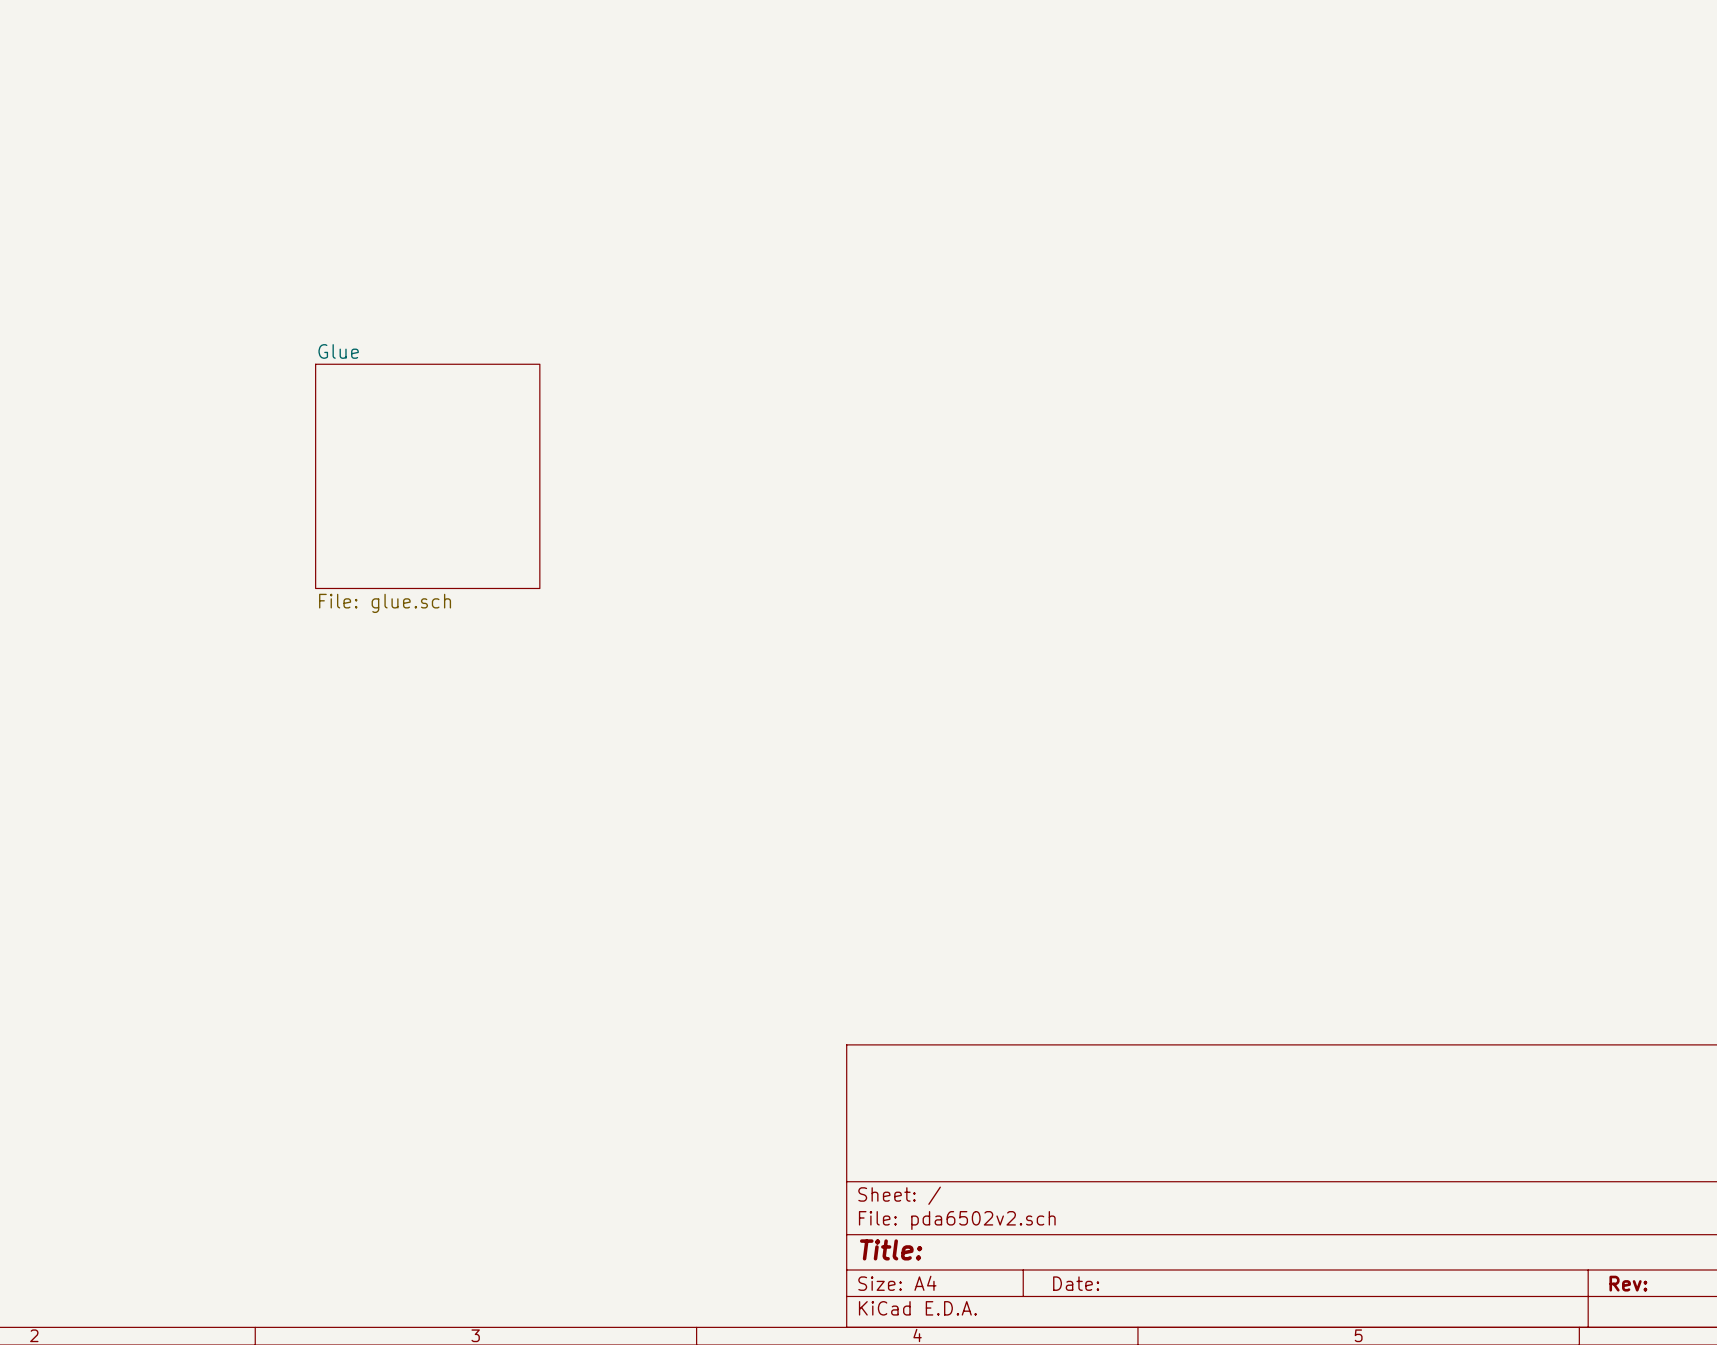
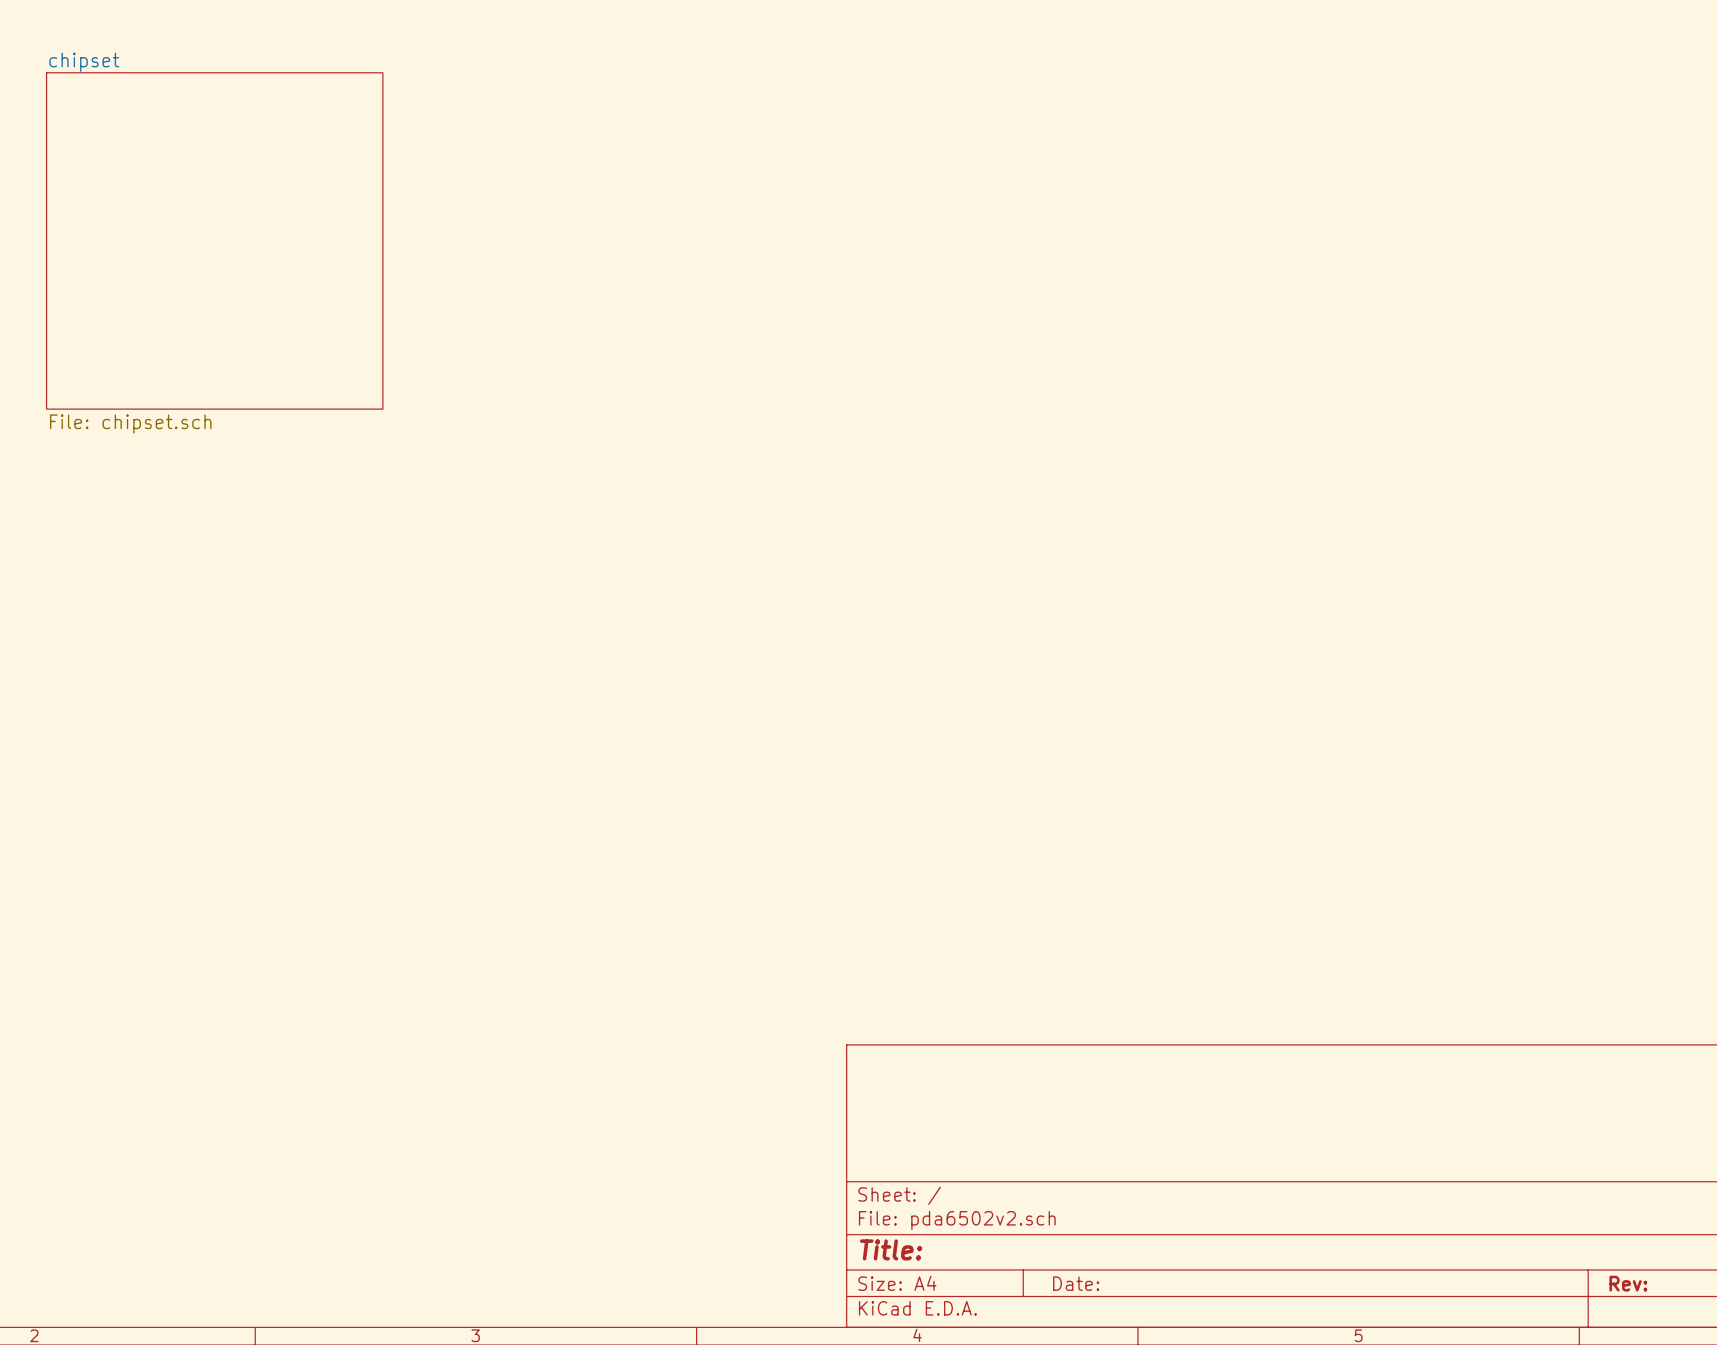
sheet chipset: none -> File: chipset.sch (214, 240)
sheet Glue: File: glue.sch (427, 476) -> none

